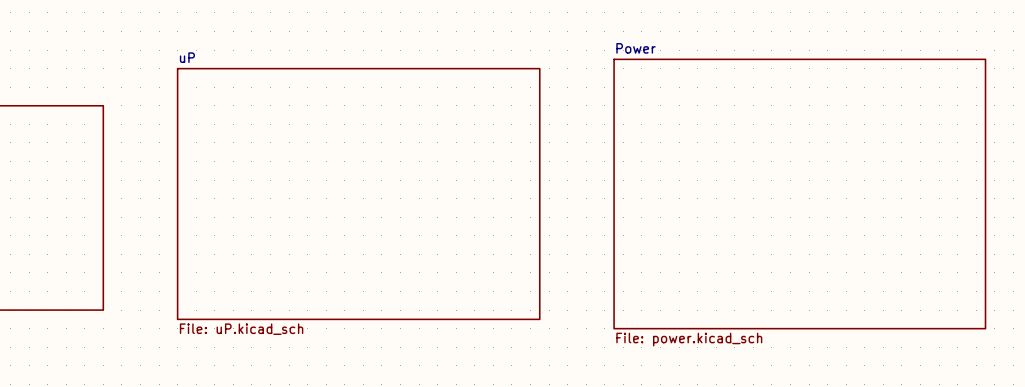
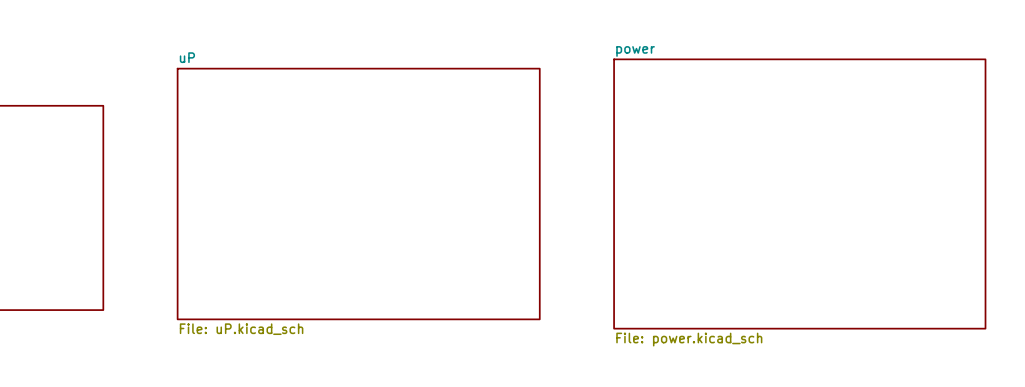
sheet Power name: Power (636, 48) -> power (635, 51)

